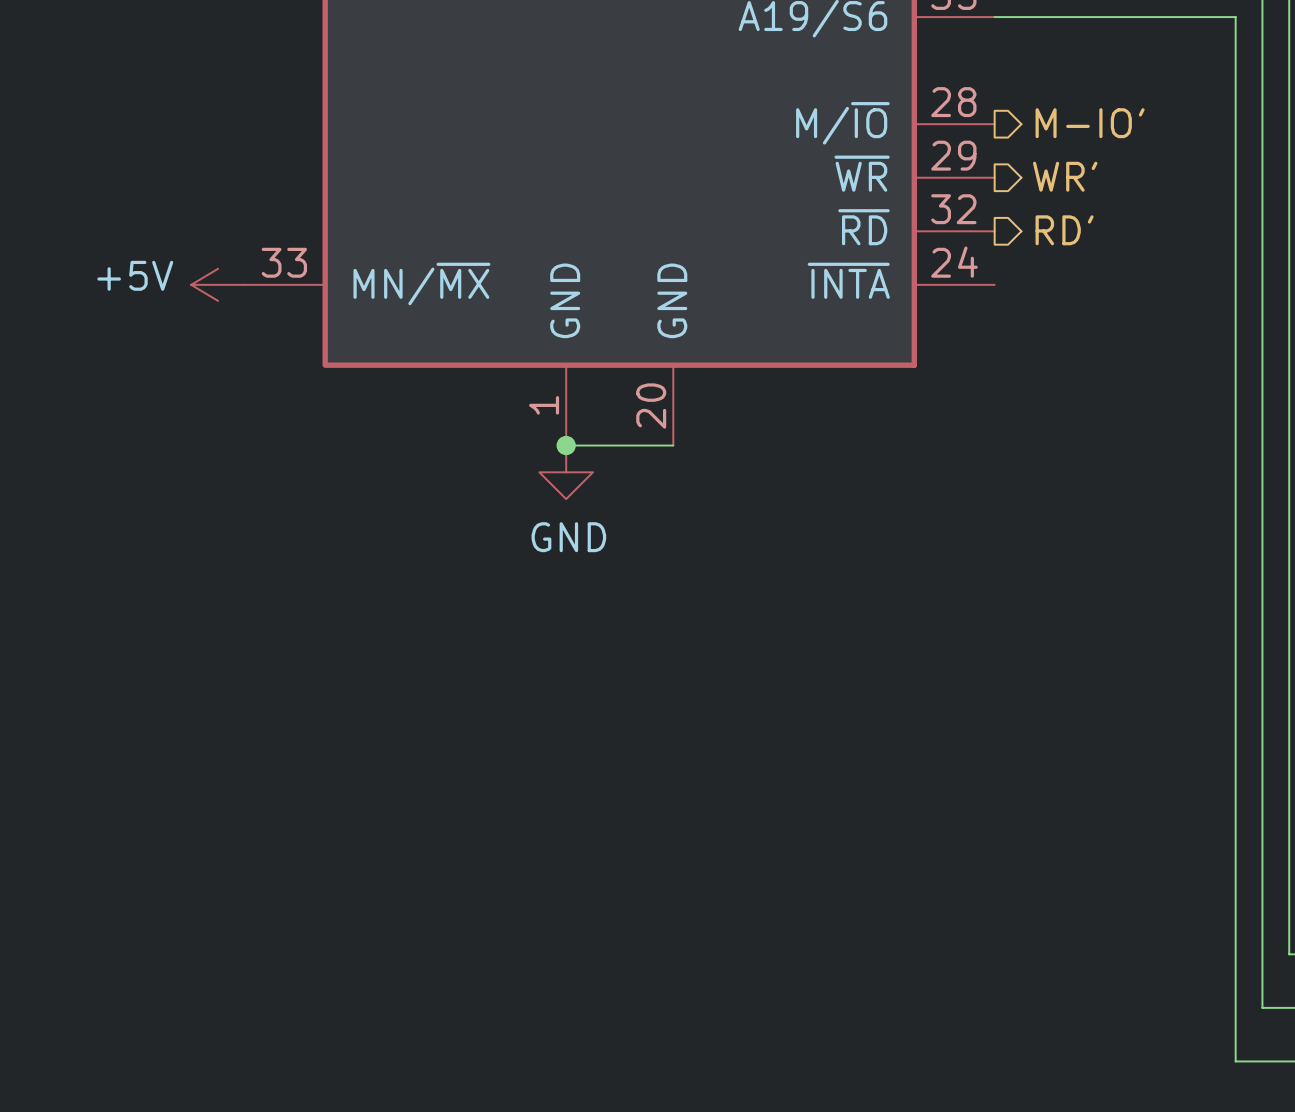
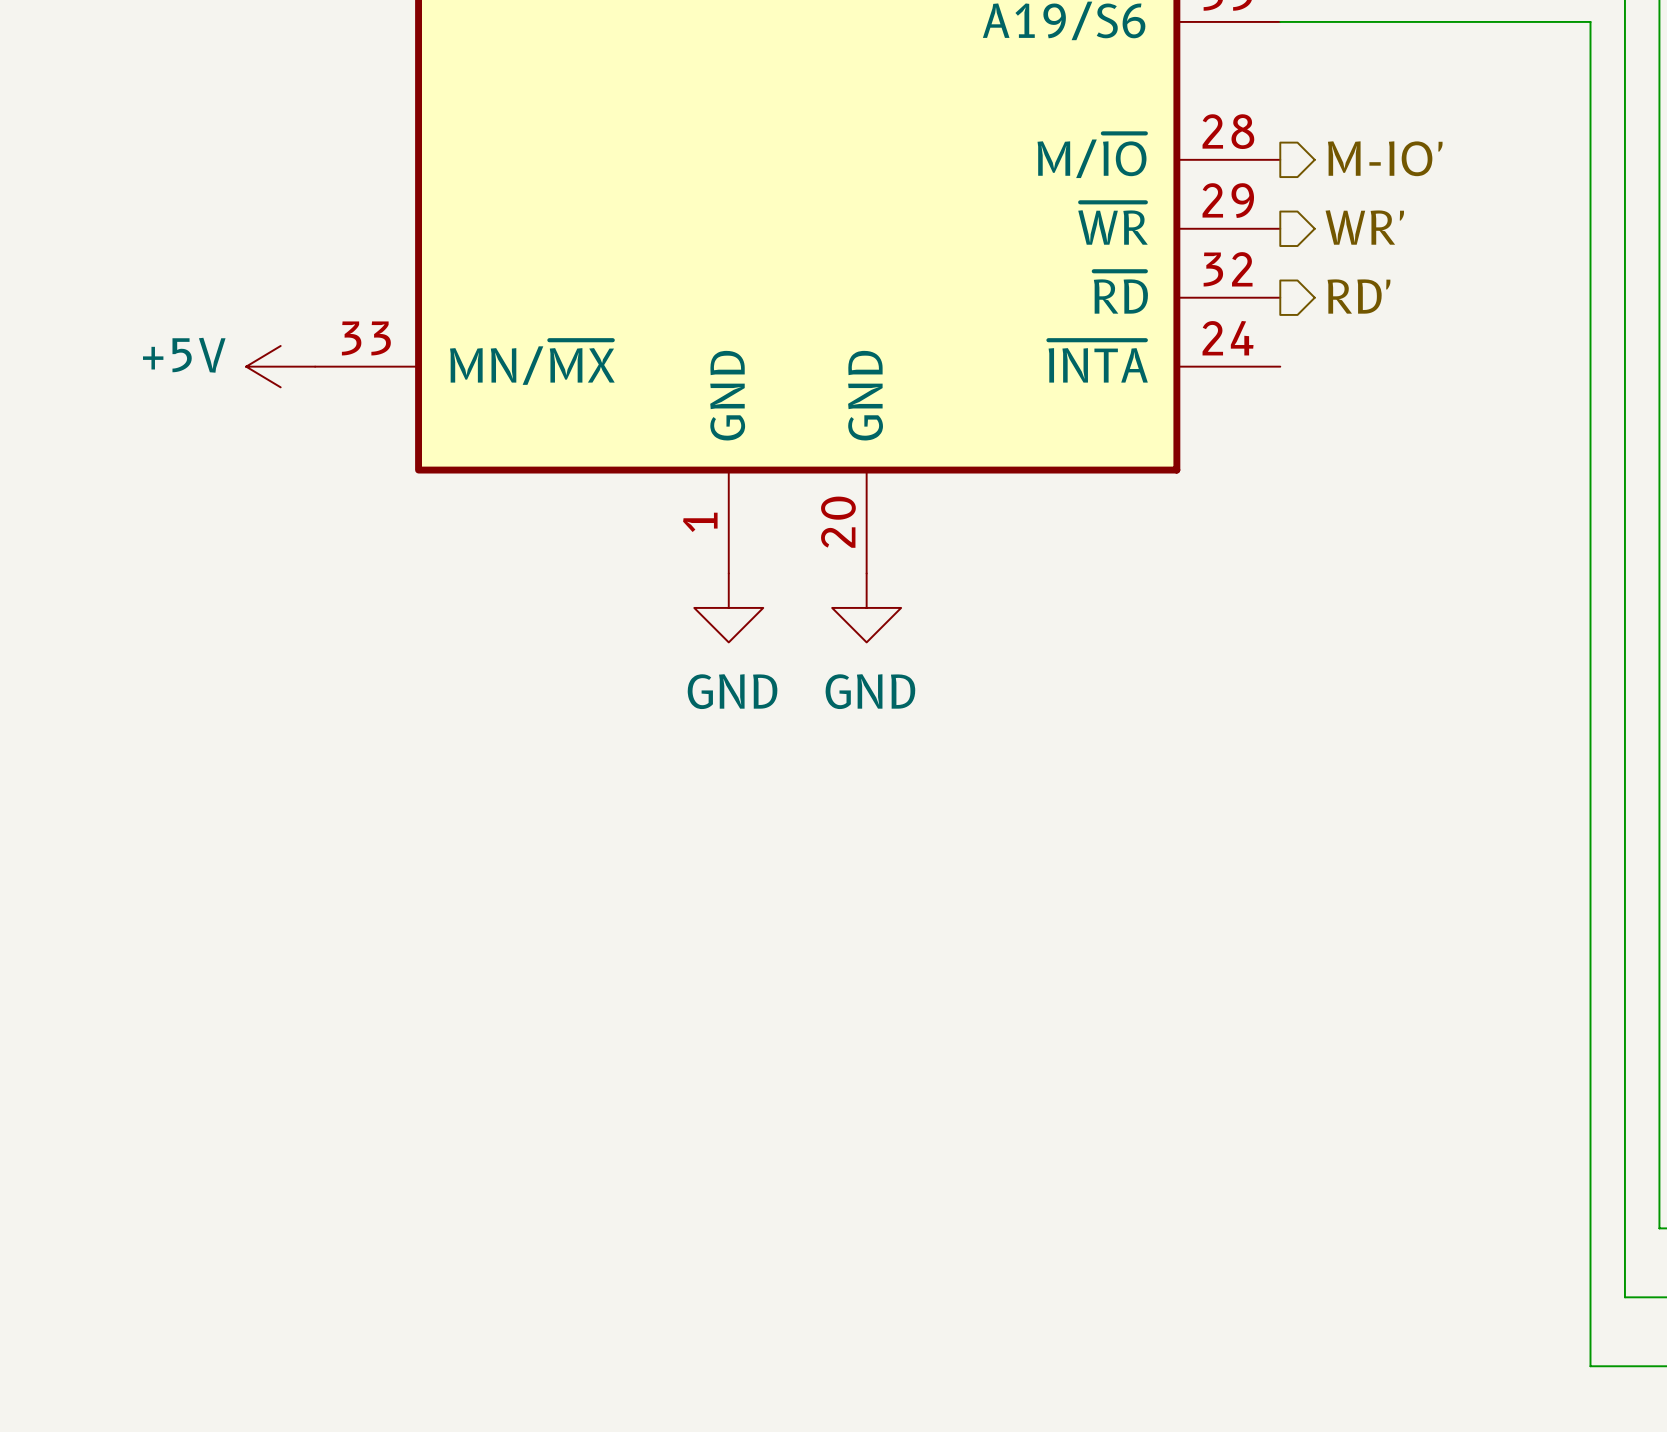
wire: (566, 445) (673, 445) -> none
junction: (566, 445) -> none
power symbol: none -> GND (866, 607)

